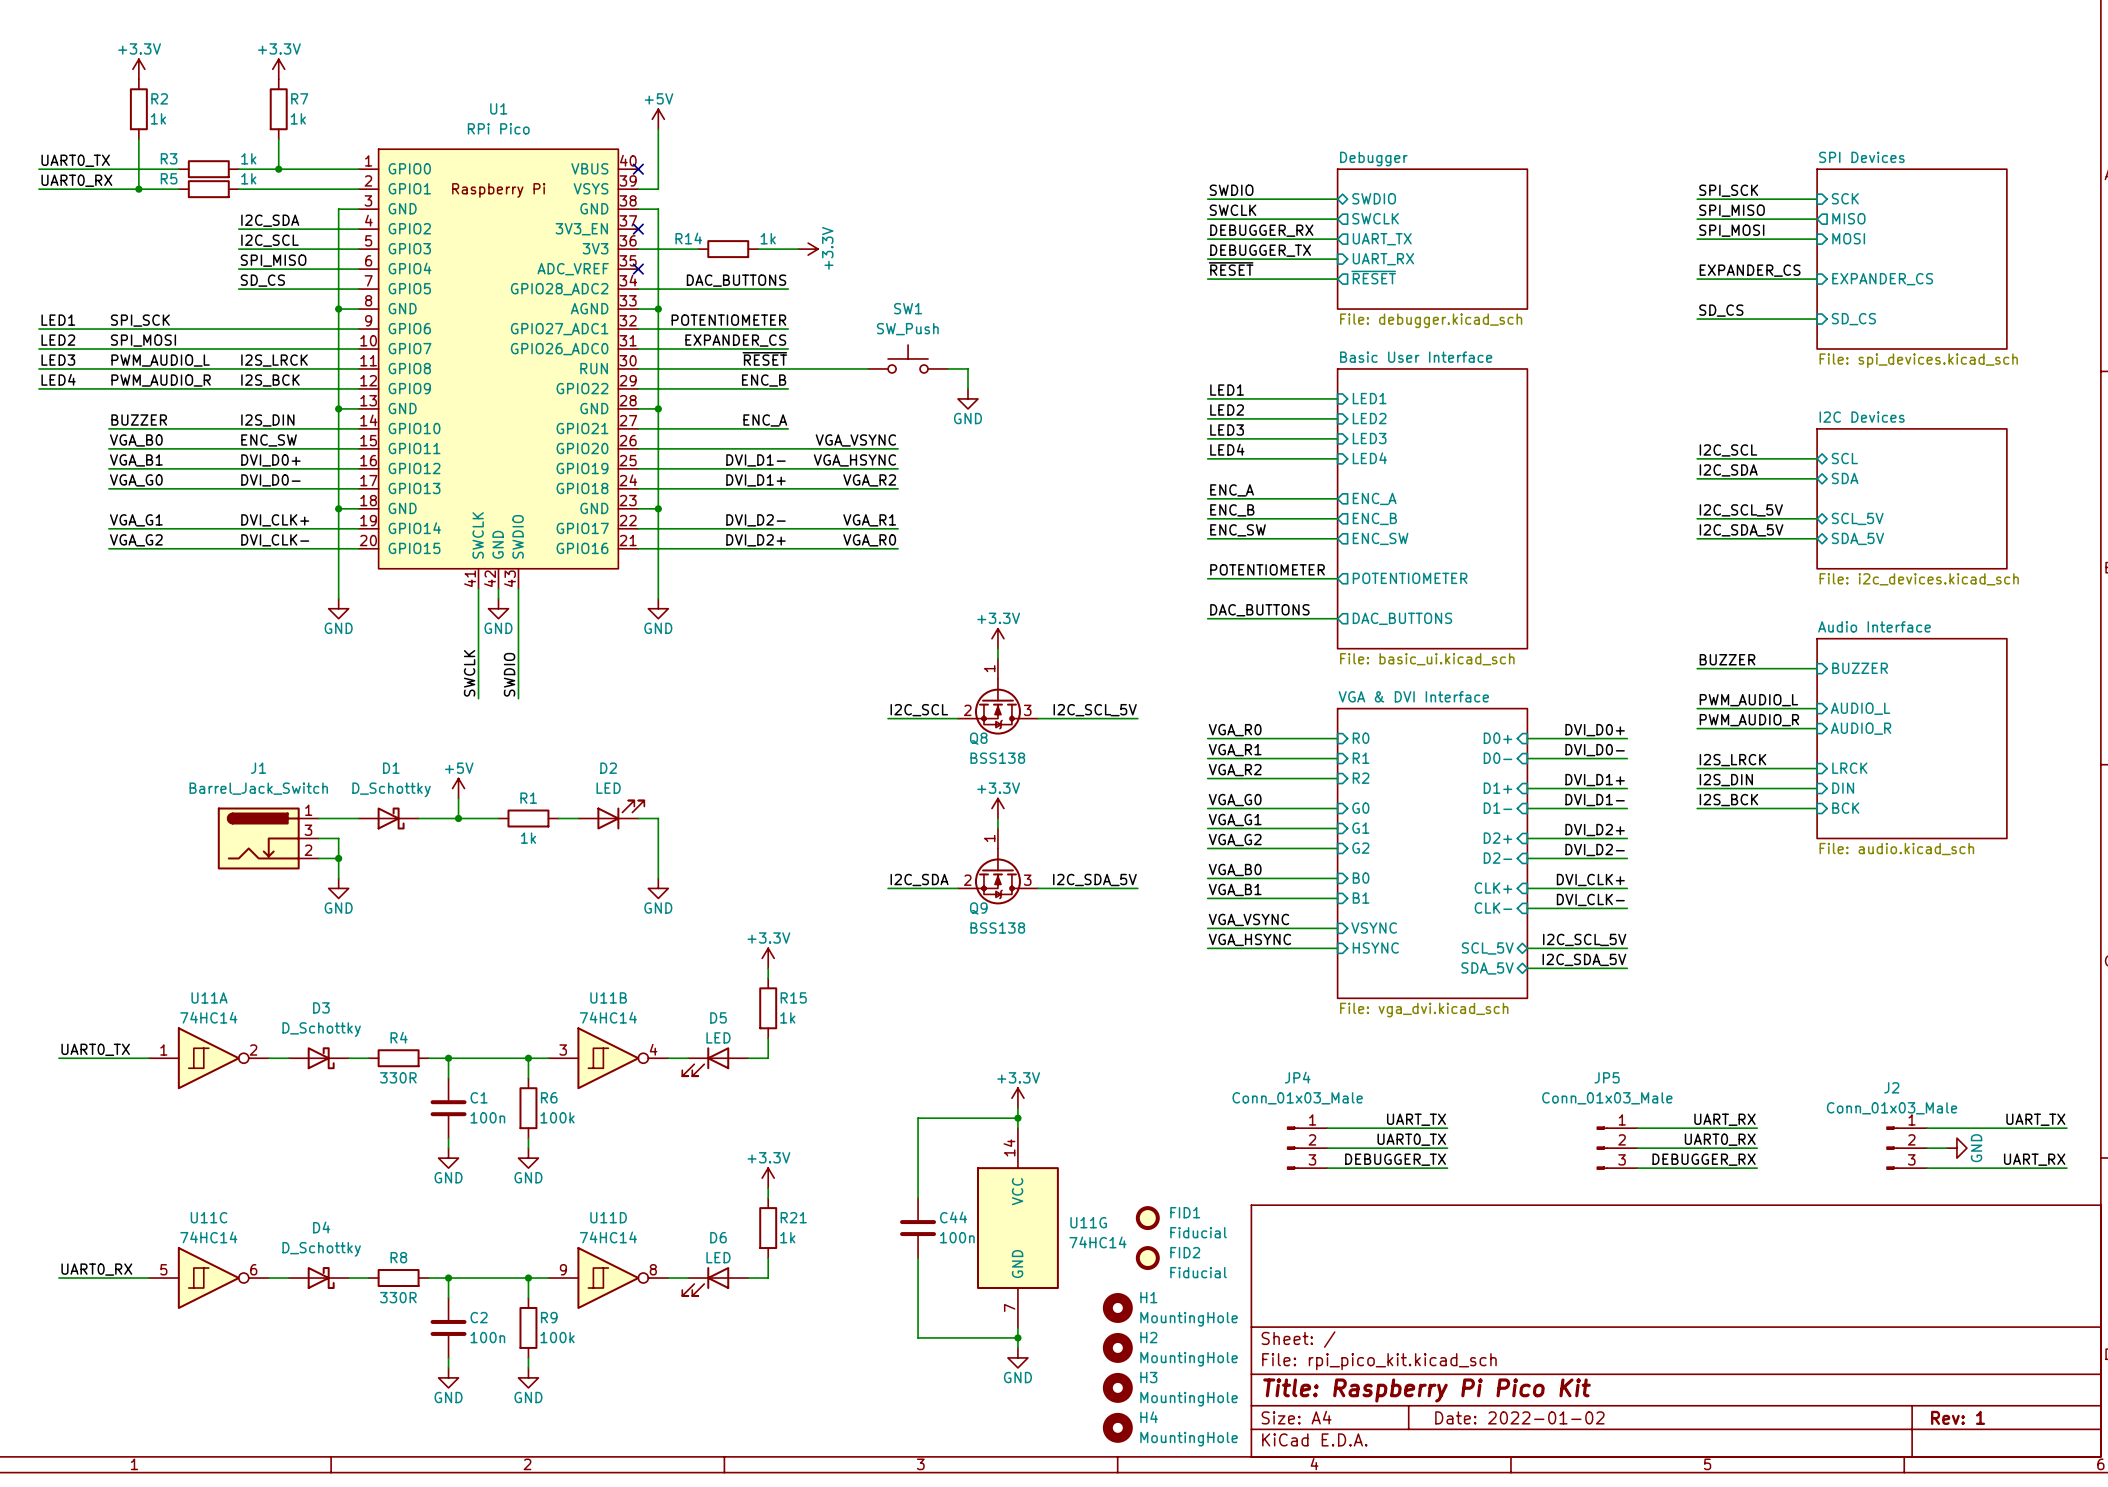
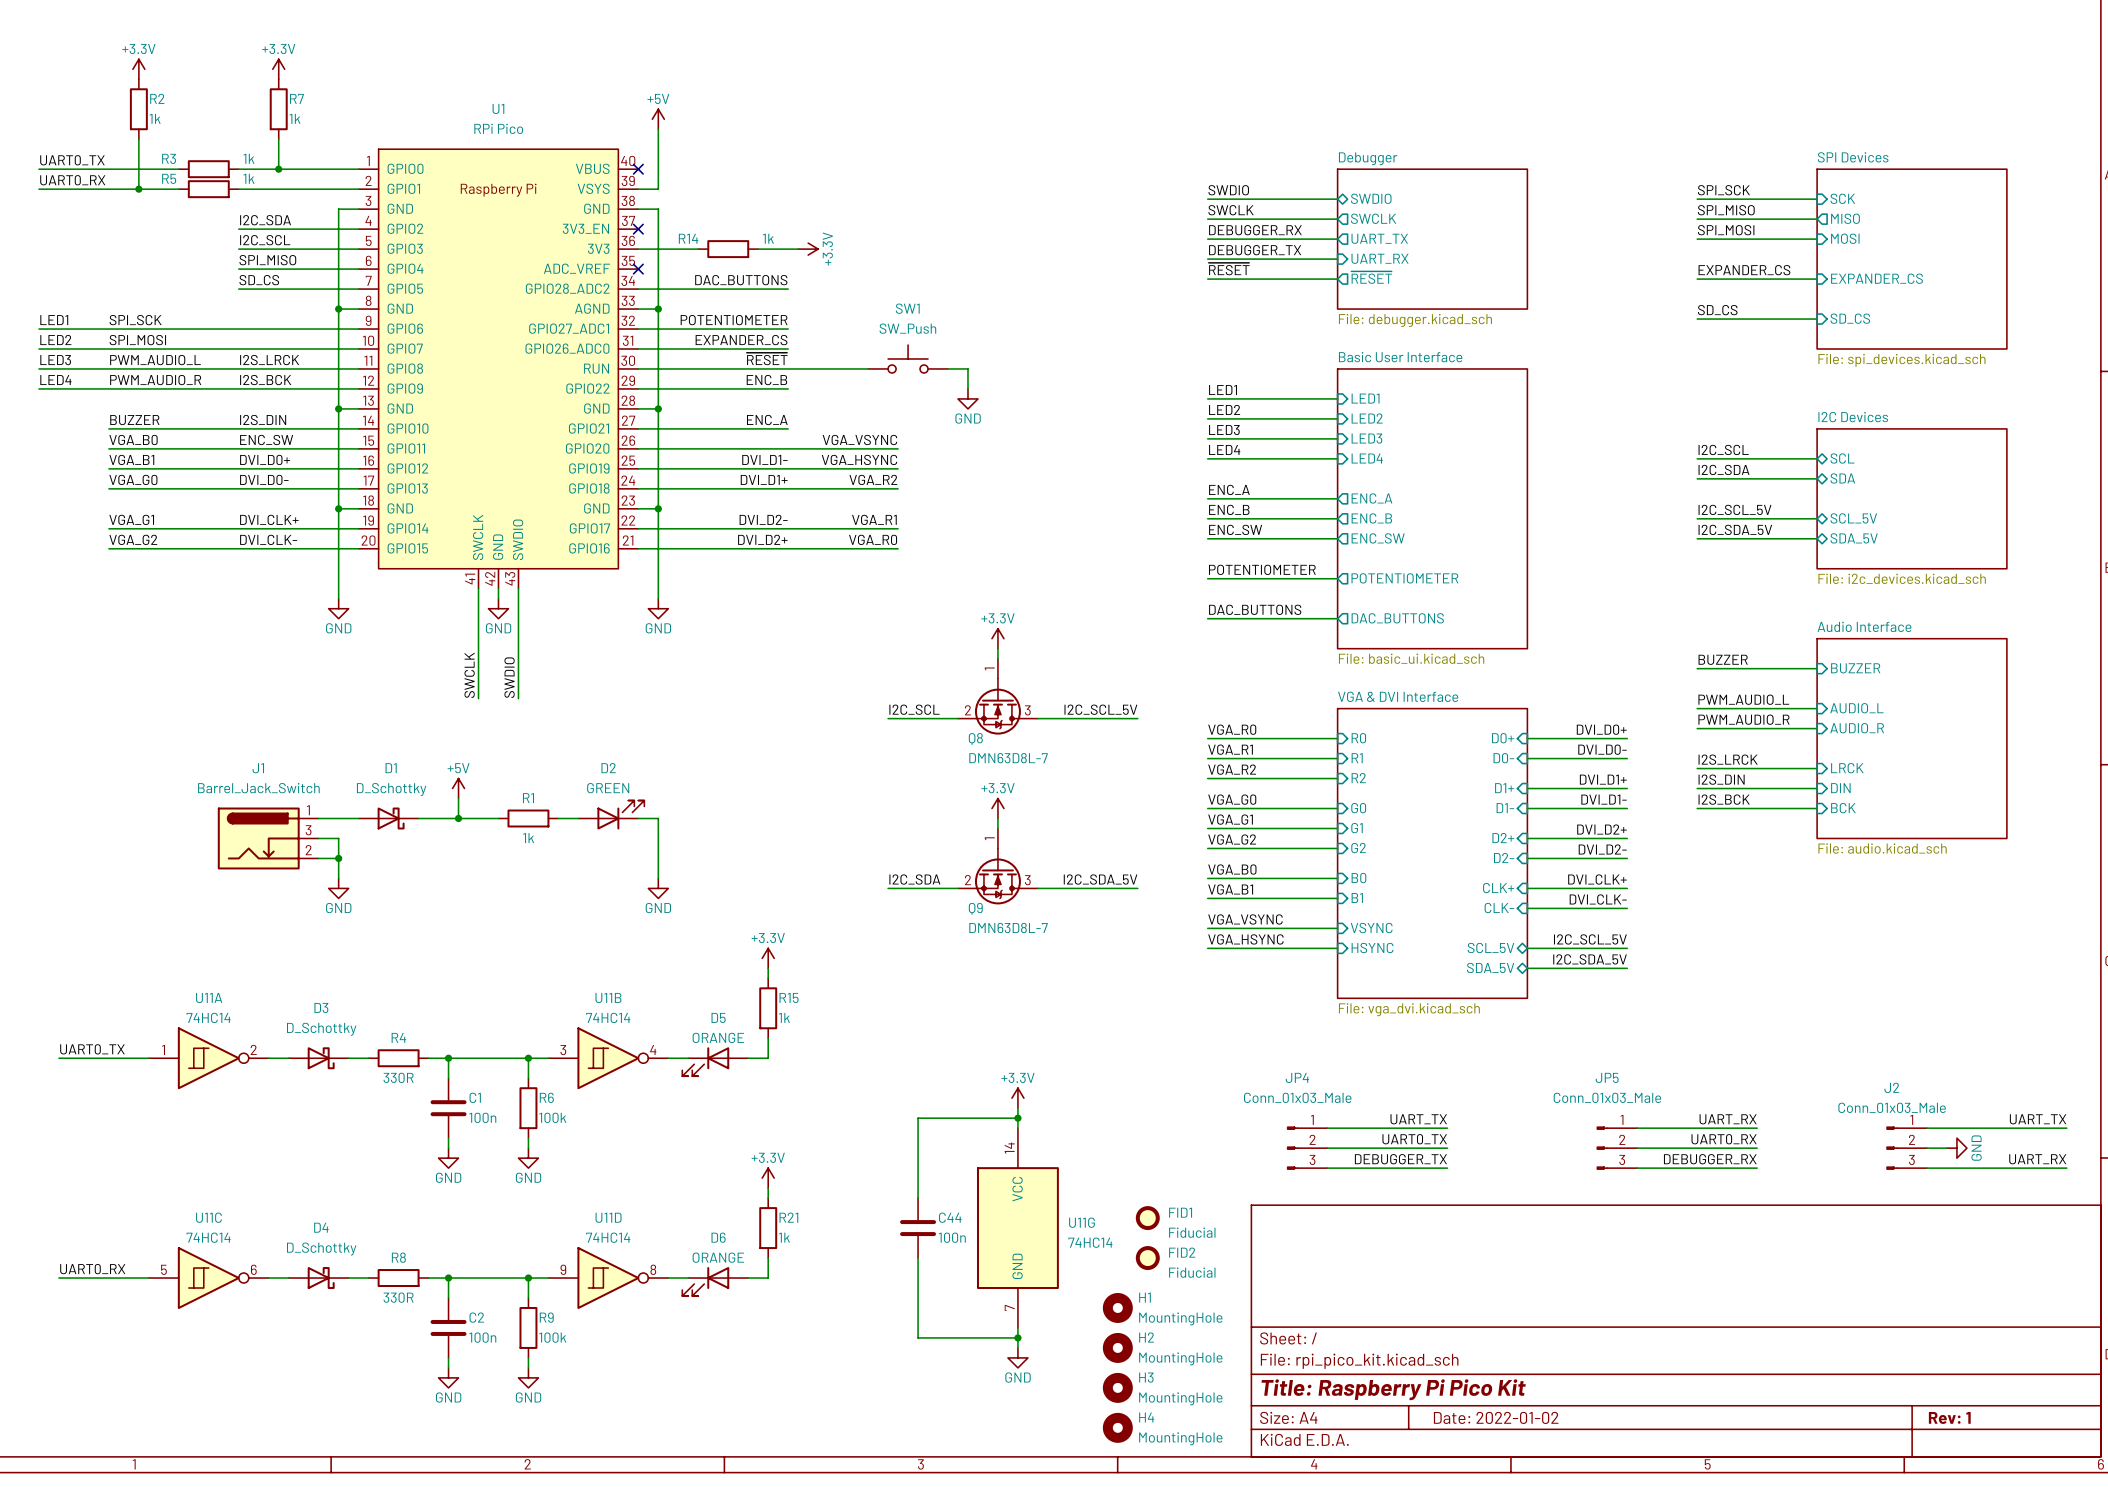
Q8 value: BSS138 (997, 758) -> DMN63D8L-7 (1008, 758)
D2 value: LED (608, 788) -> GREEN (608, 788)
Q9 value: BSS138 (997, 928) -> DMN63D8L-7 (1008, 928)
D5 value: LED (718, 1037) -> ORANGE (718, 1037)
D6 value: LED (718, 1257) -> ORANGE (718, 1257)

